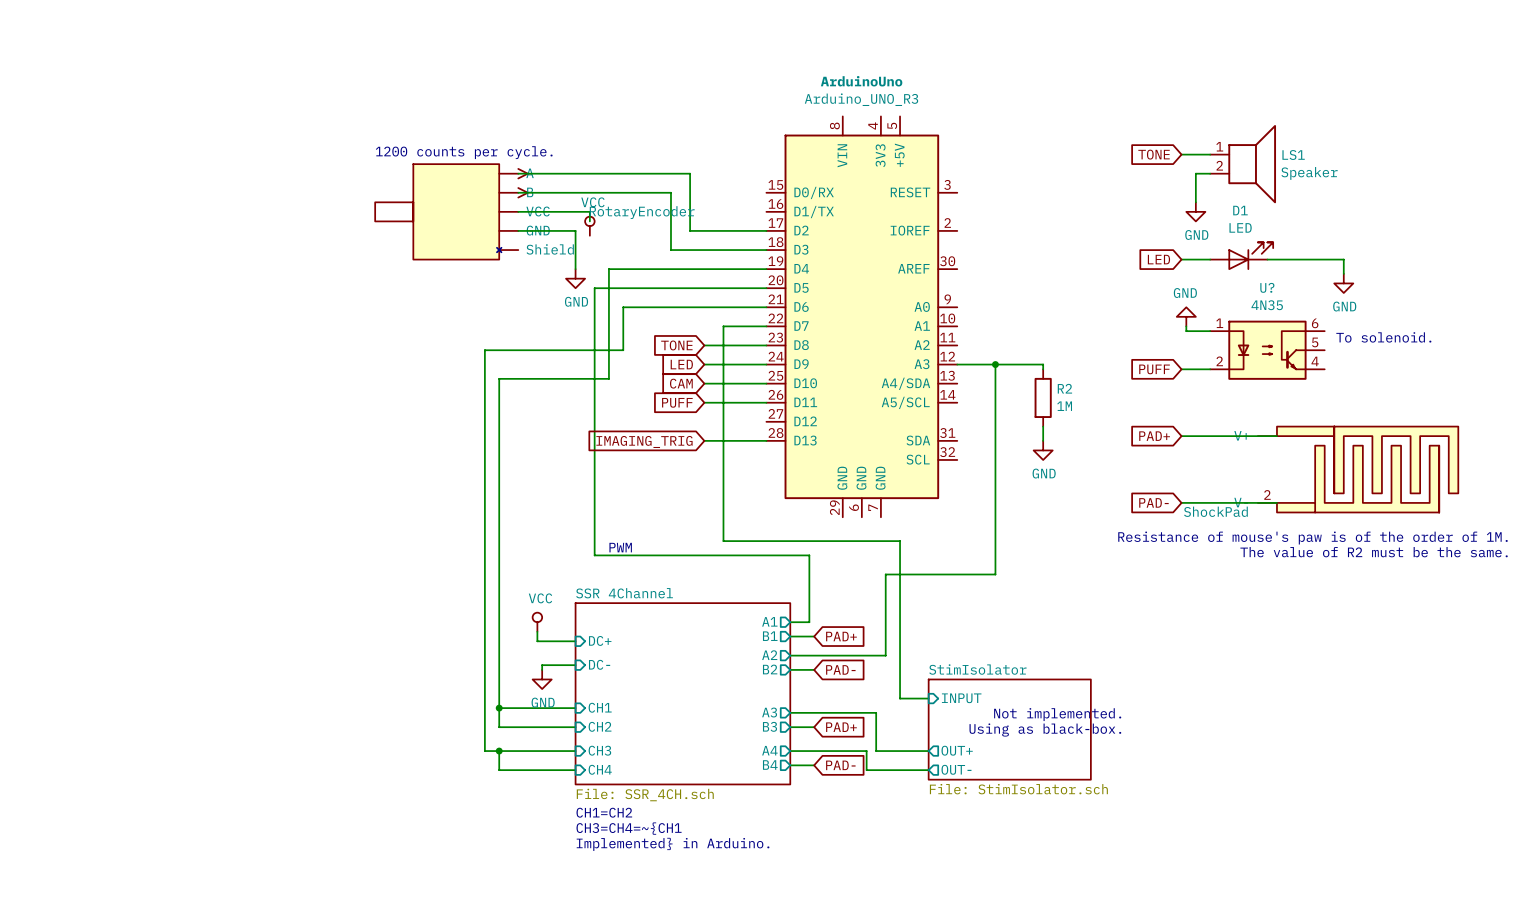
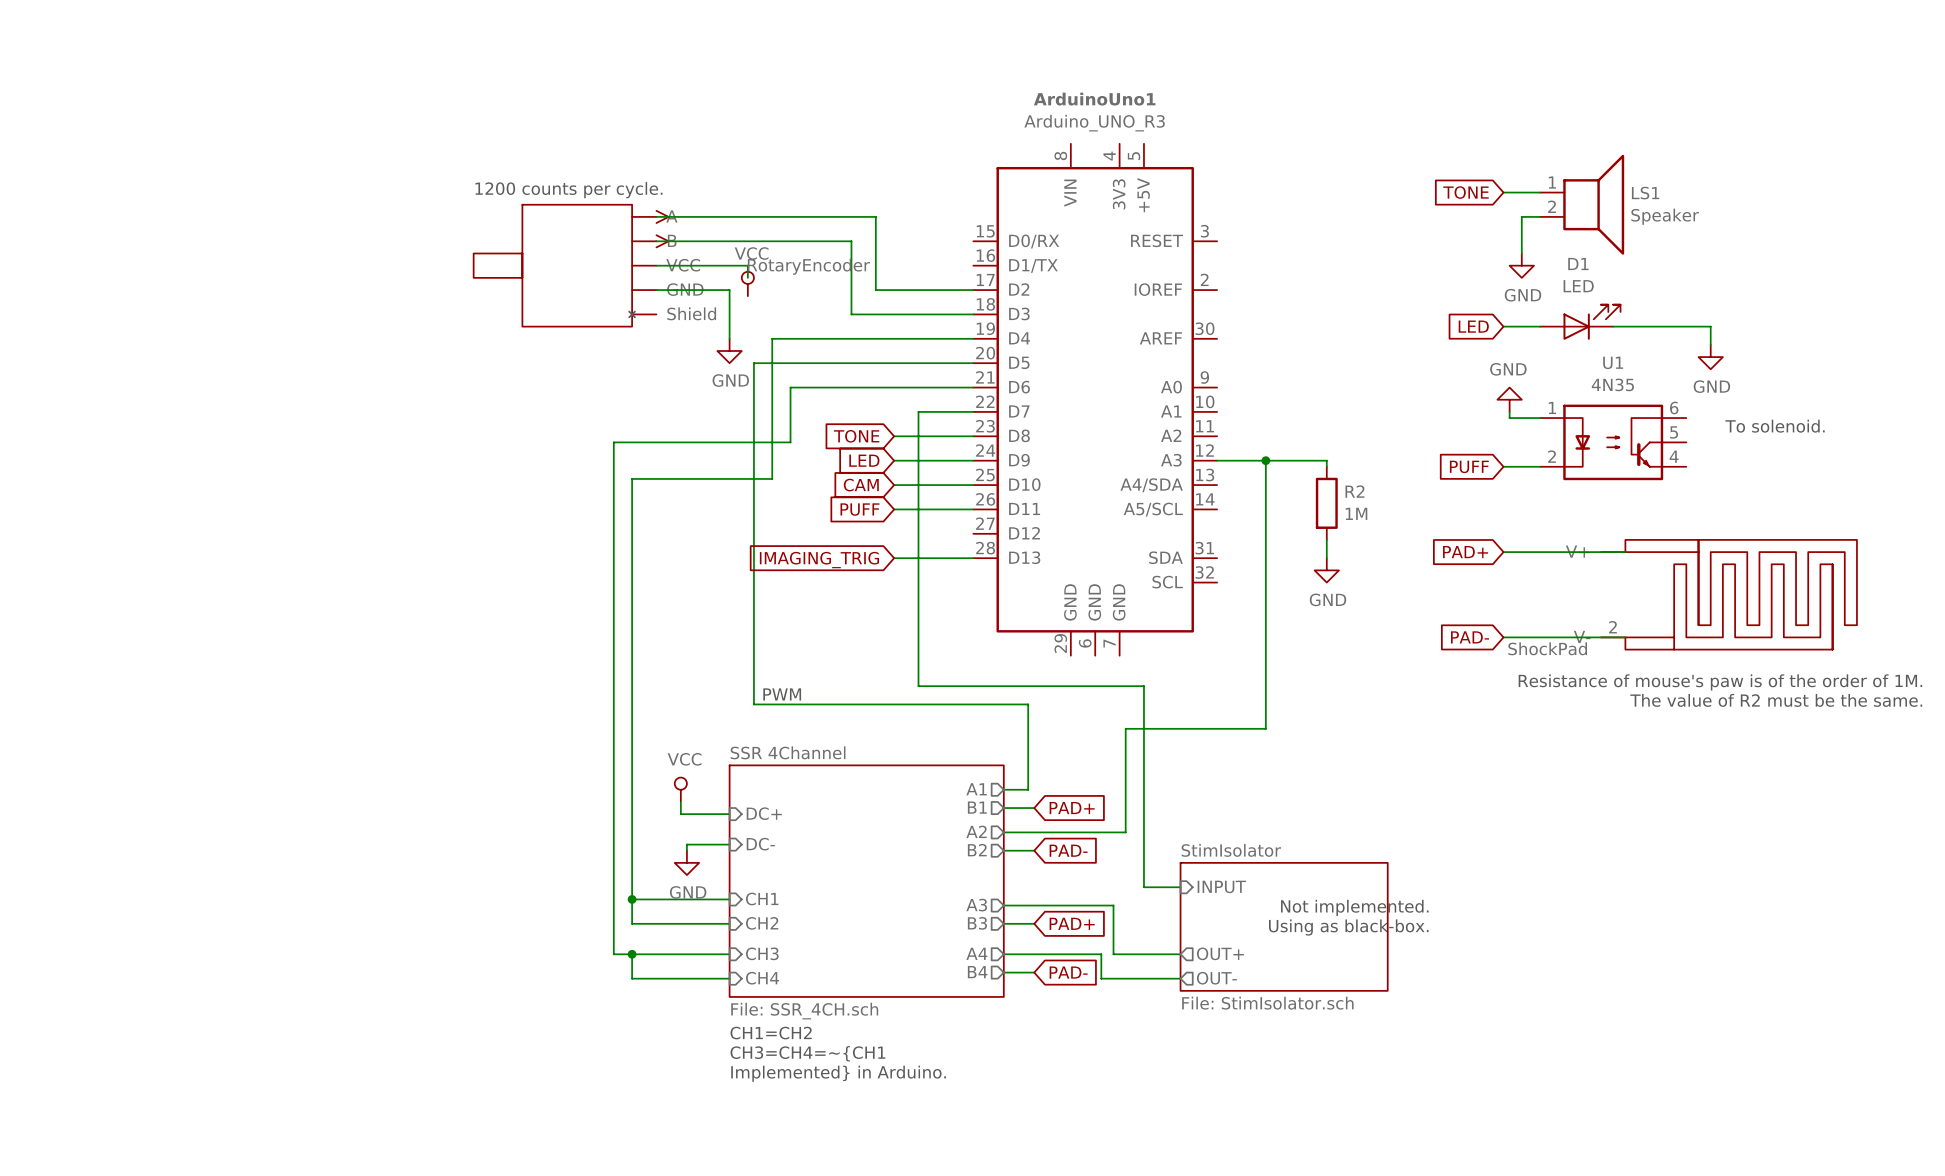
ArduinoUno name: ArduinoUno (861, 81) -> ArduinoUno1 (1094, 99)
U? name: U? (1267, 287) -> U1 (1613, 362)

